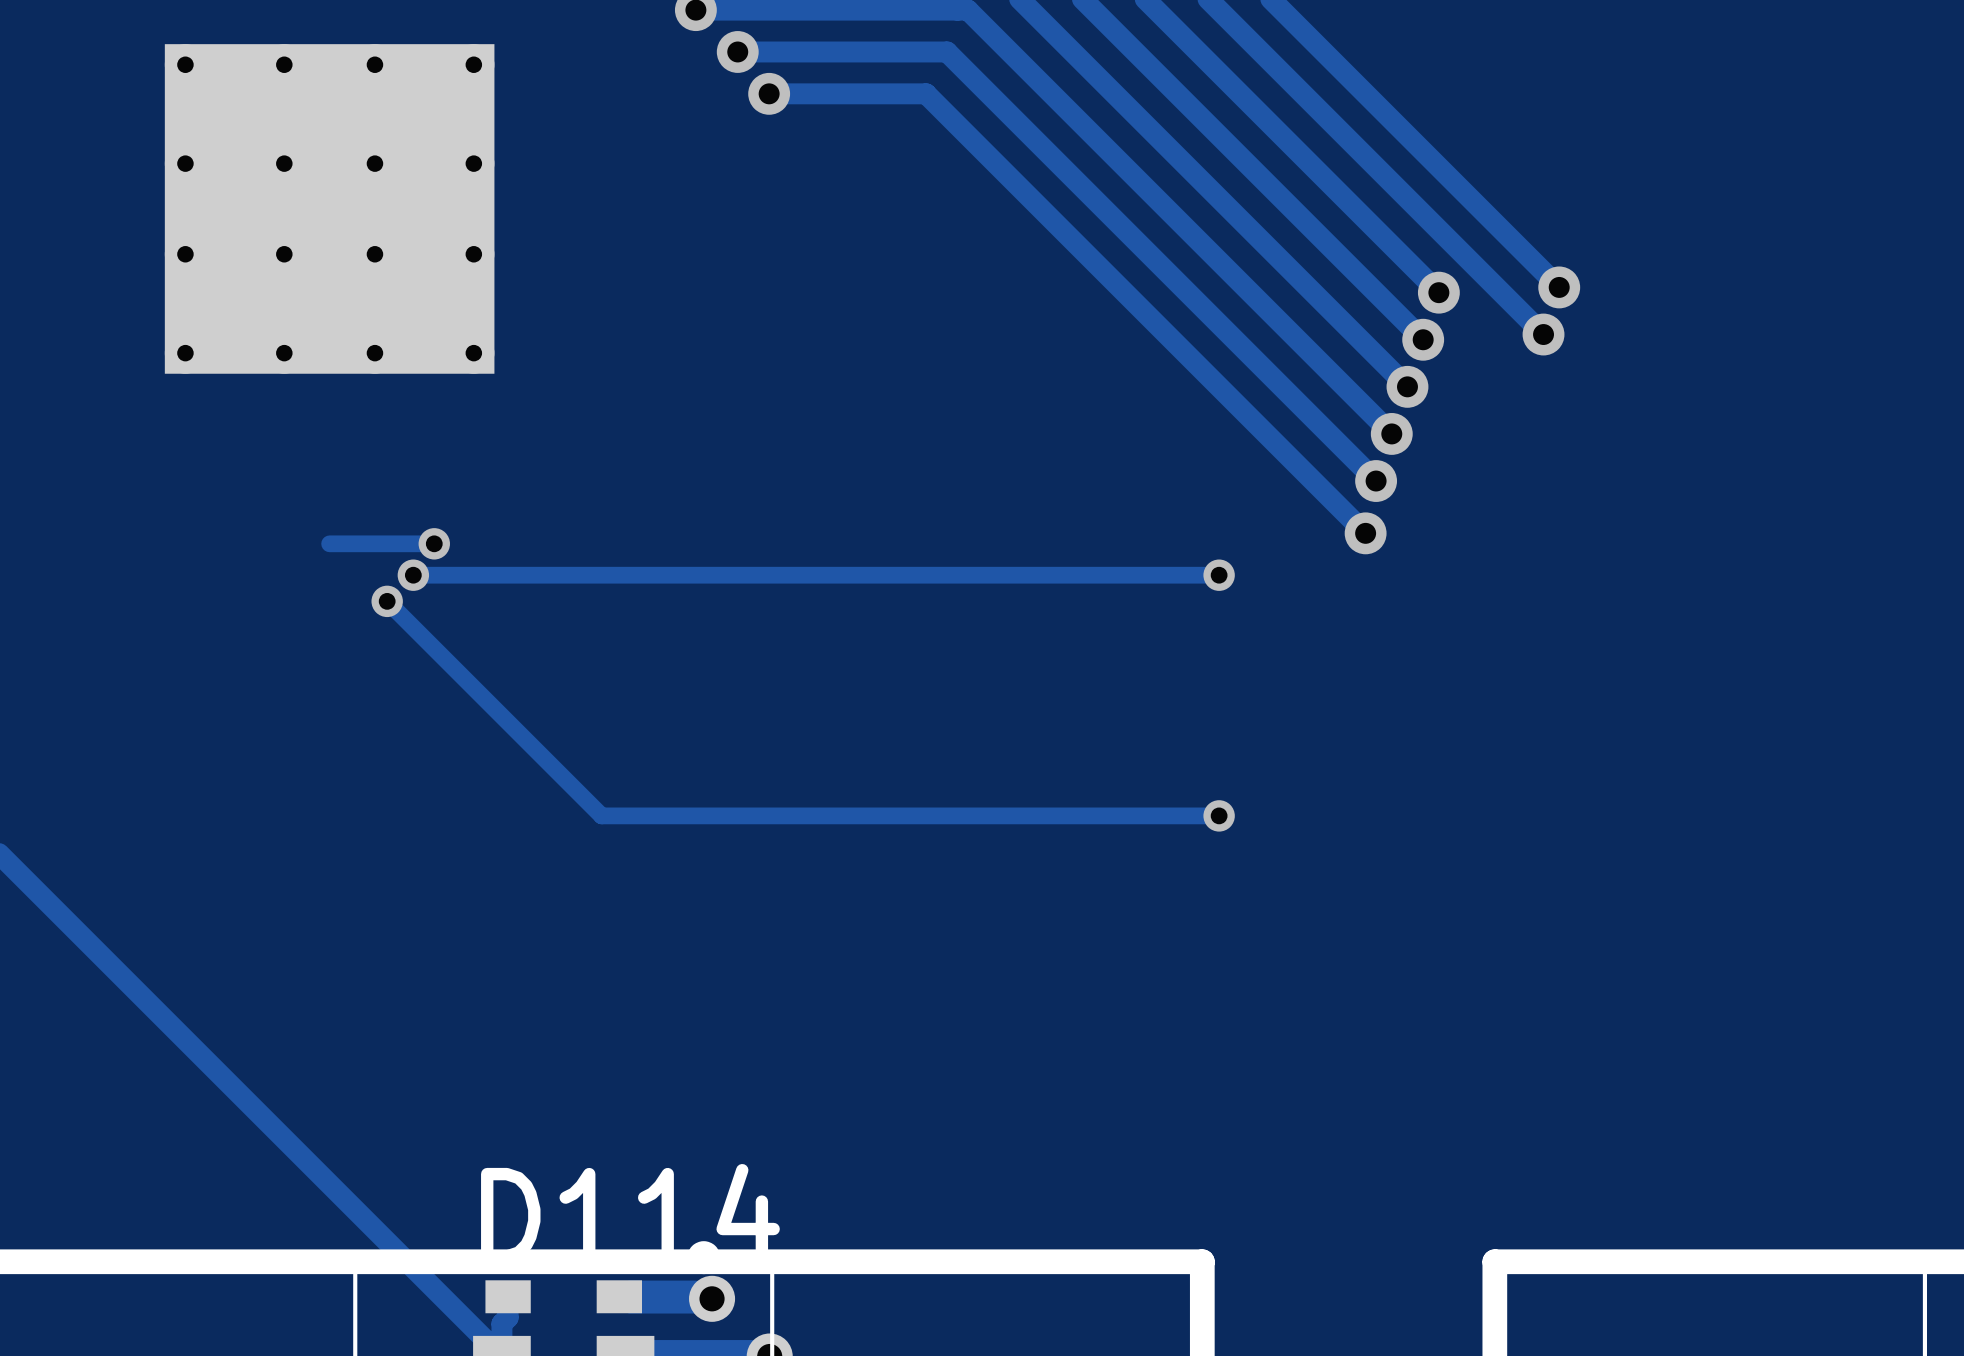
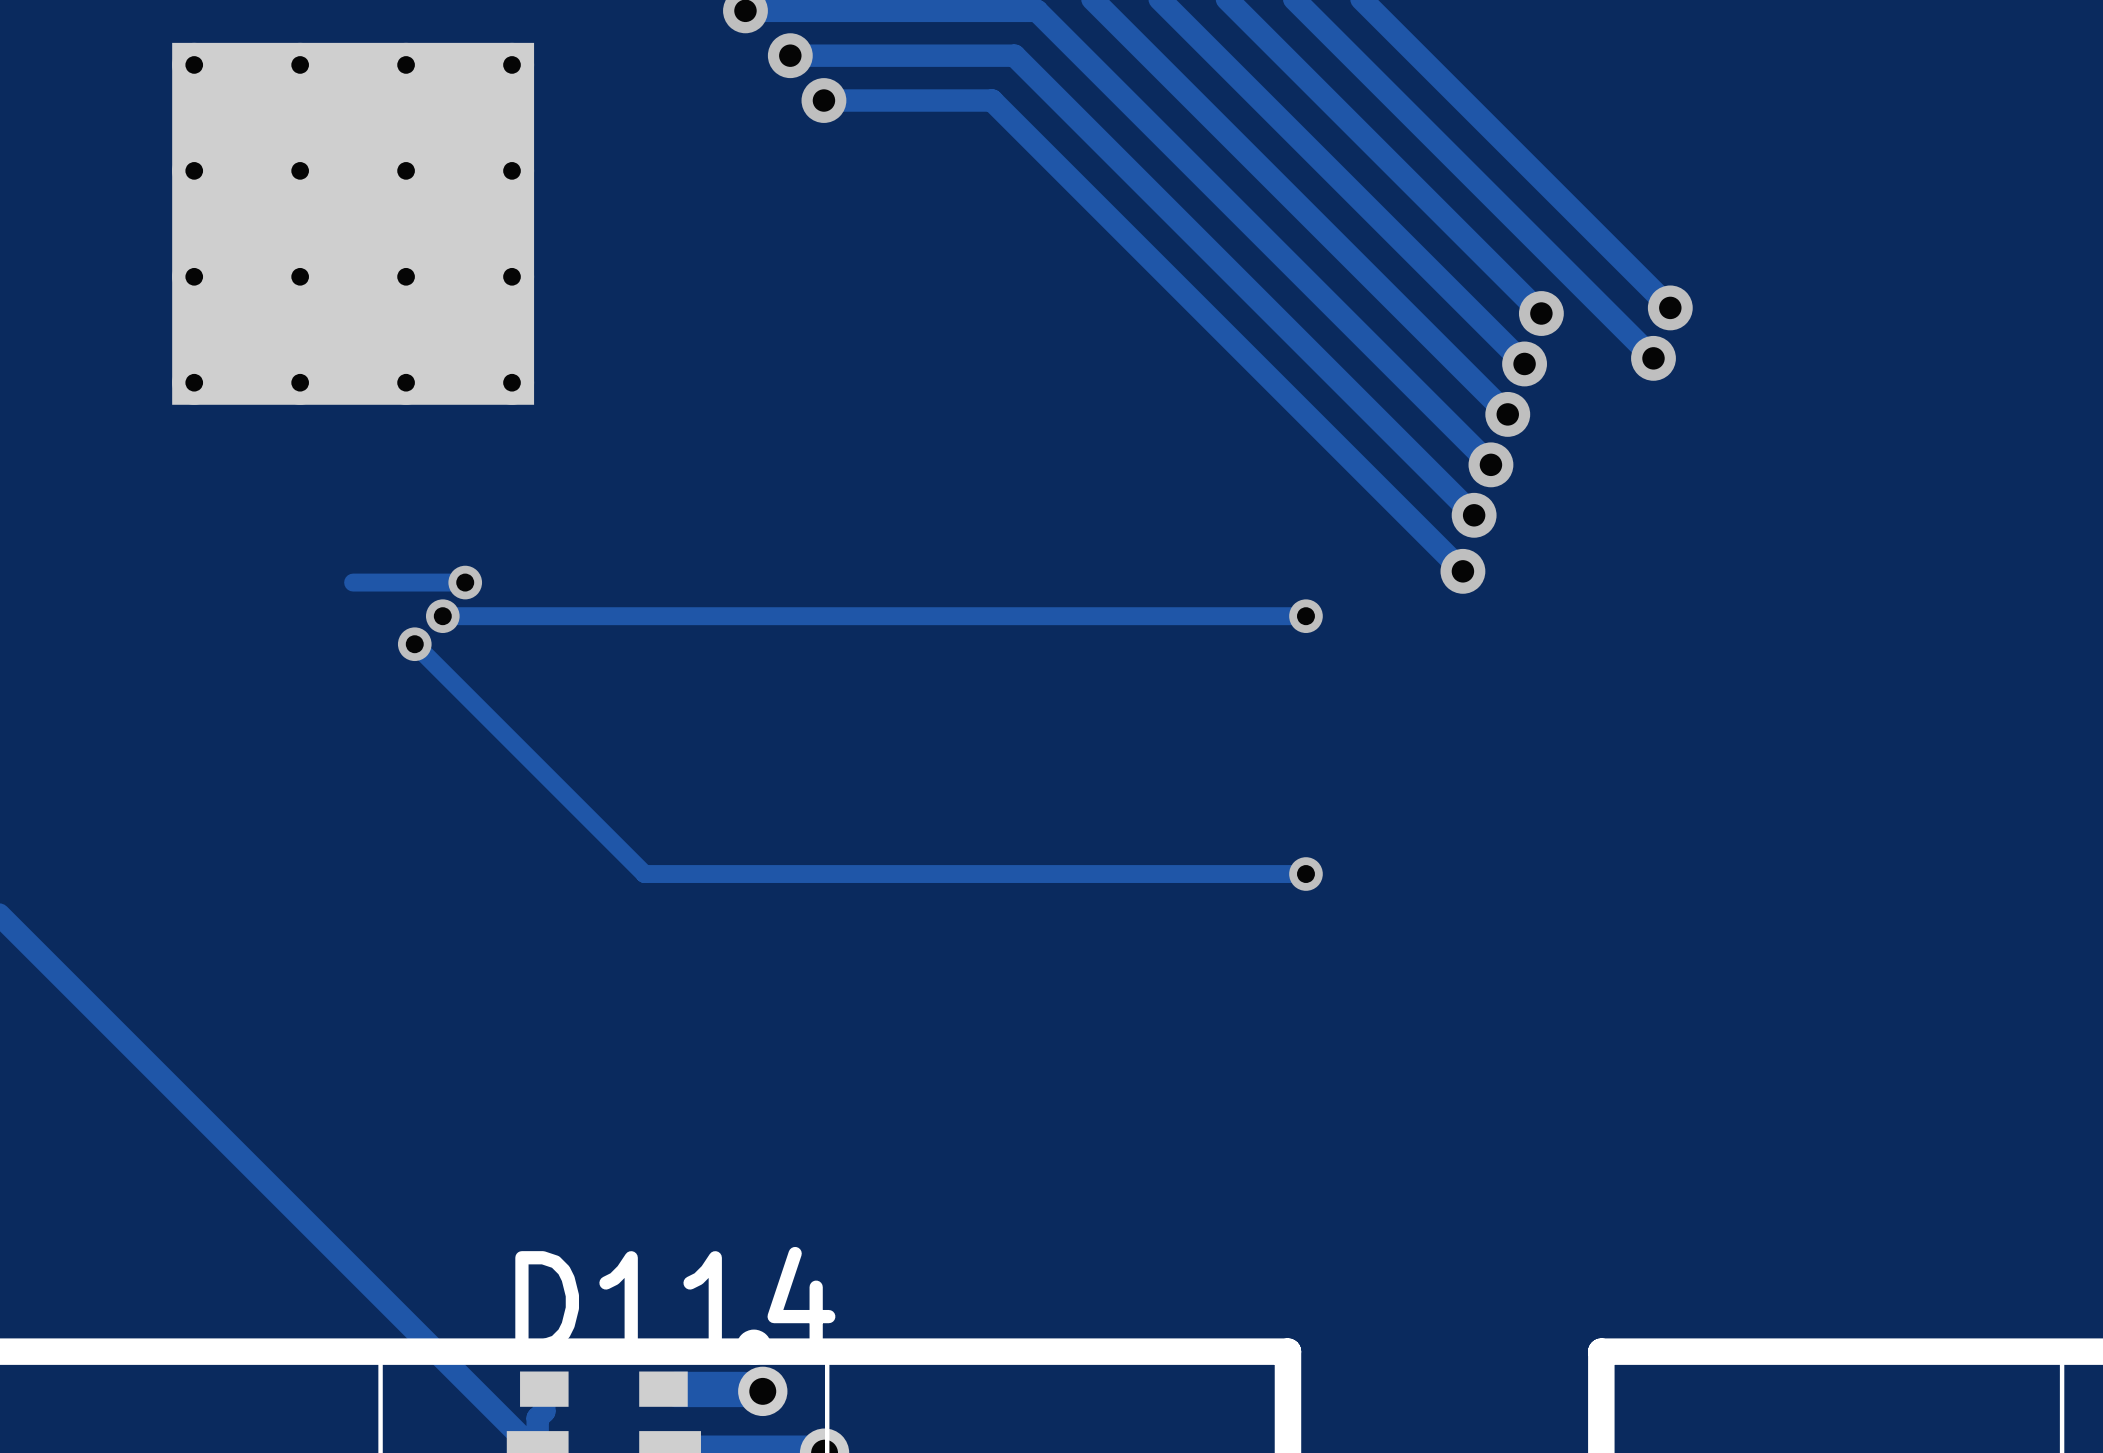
part footprint: [164, 44, 495, 374] -> [172, 42, 535, 405]

